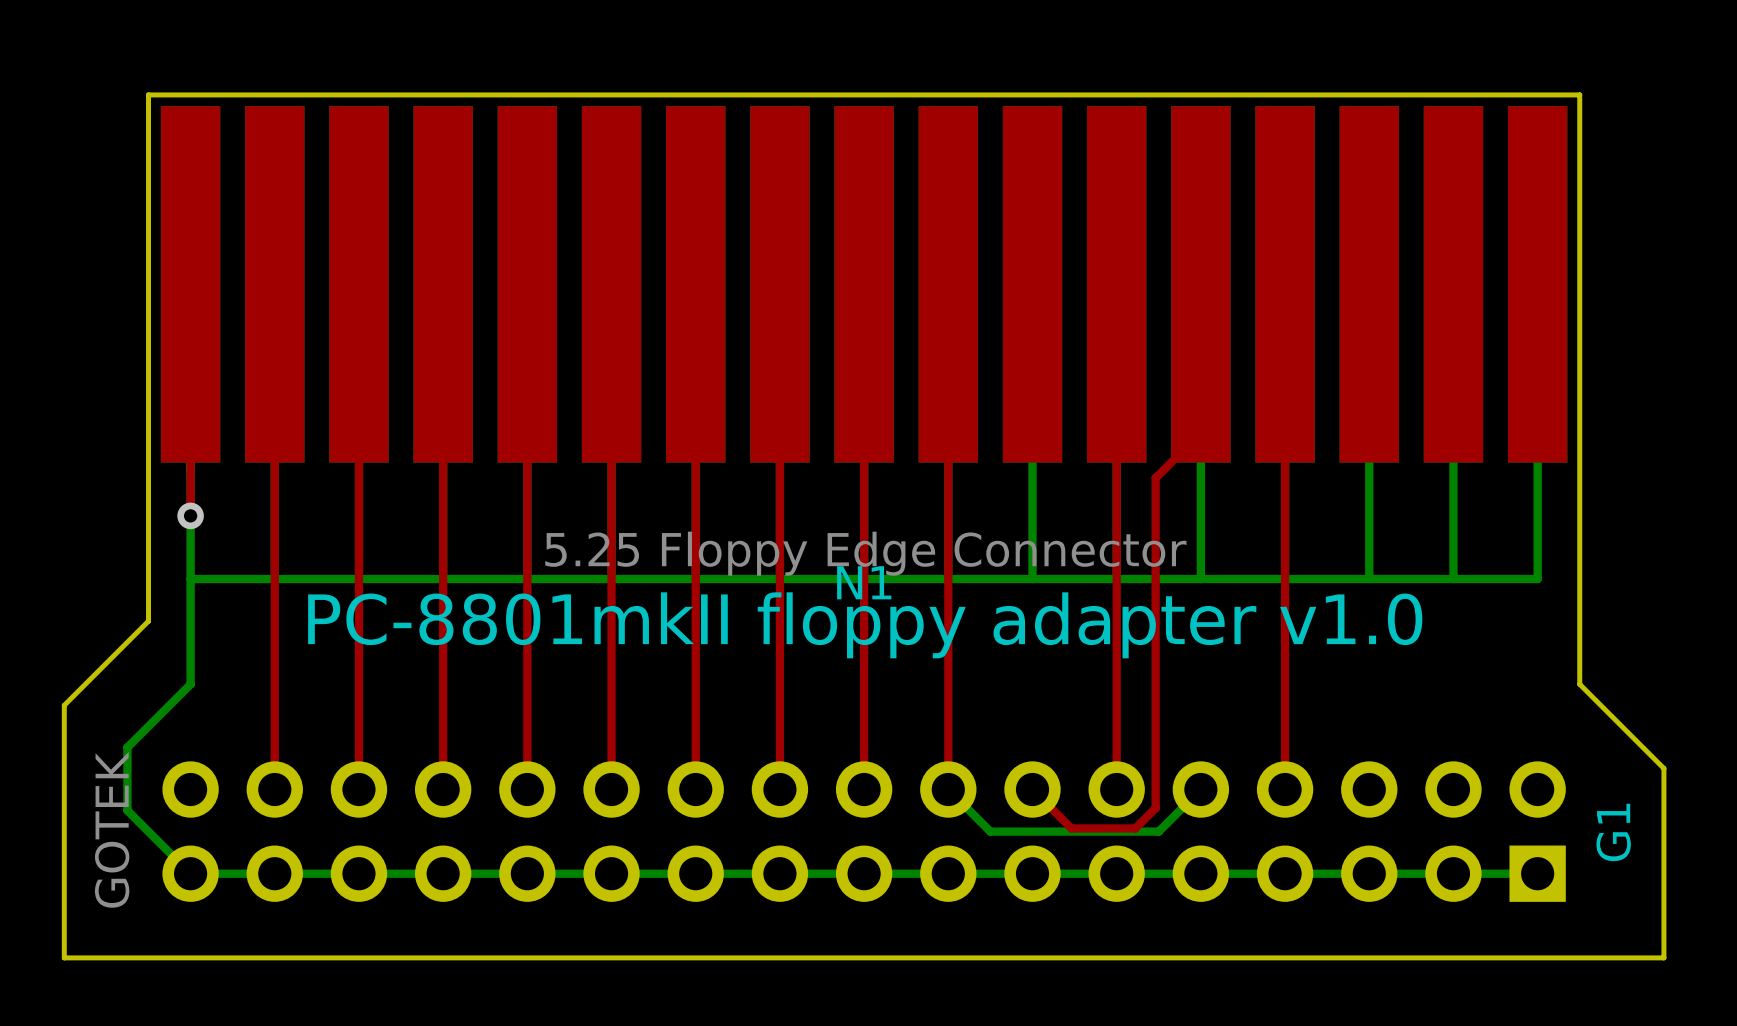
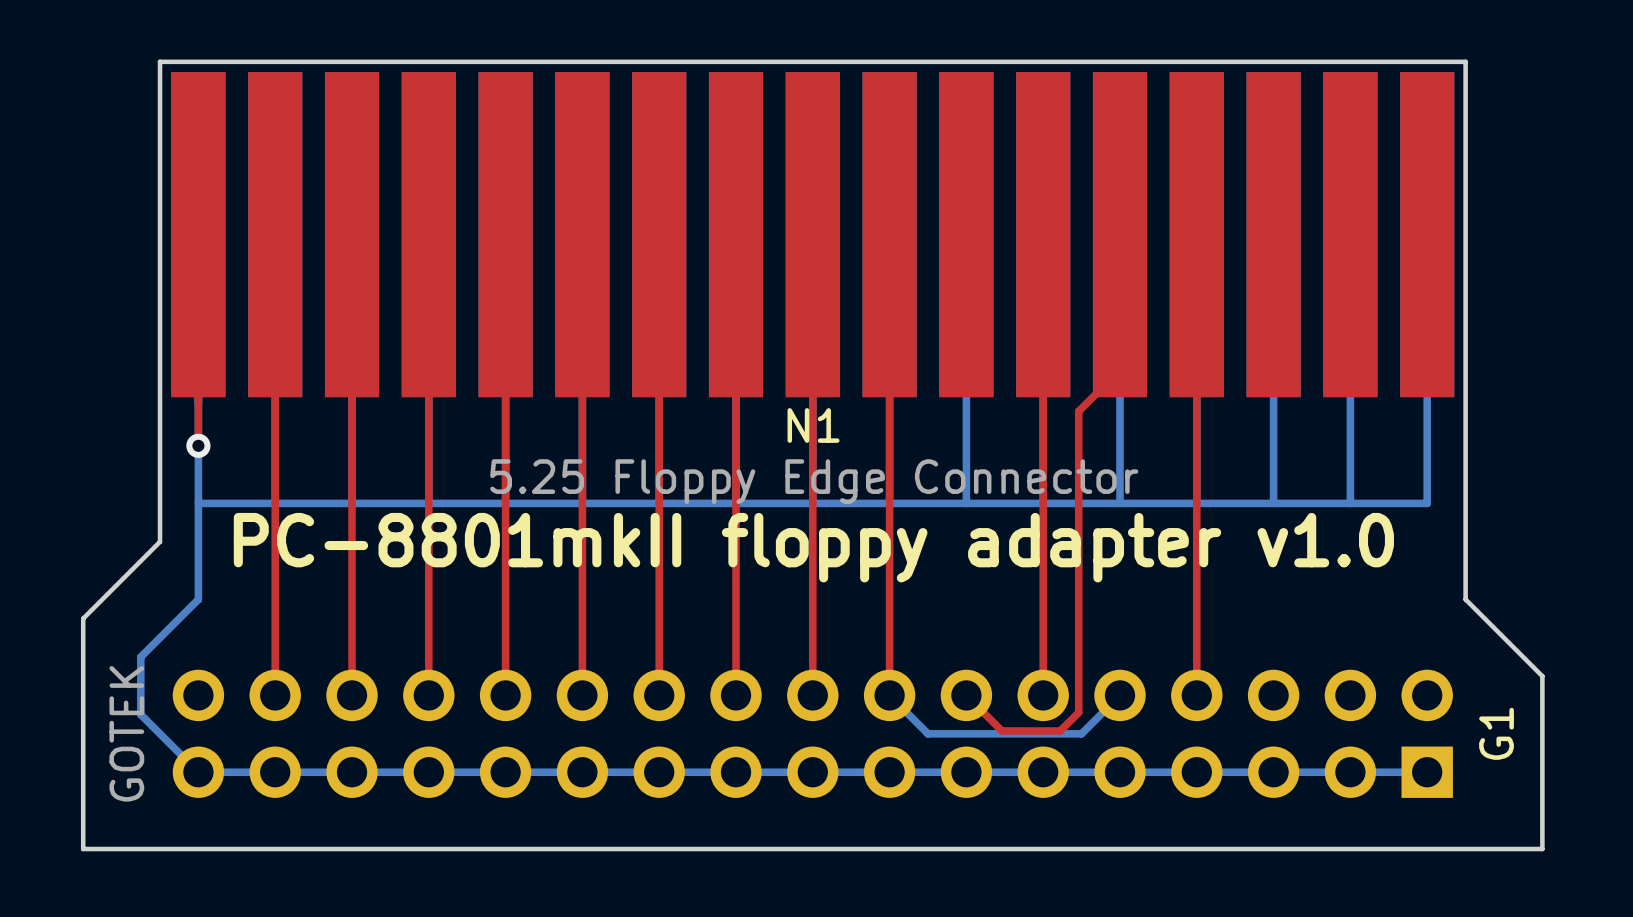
N1 name position: N1 (864, 582) -> N1 (813, 425)

